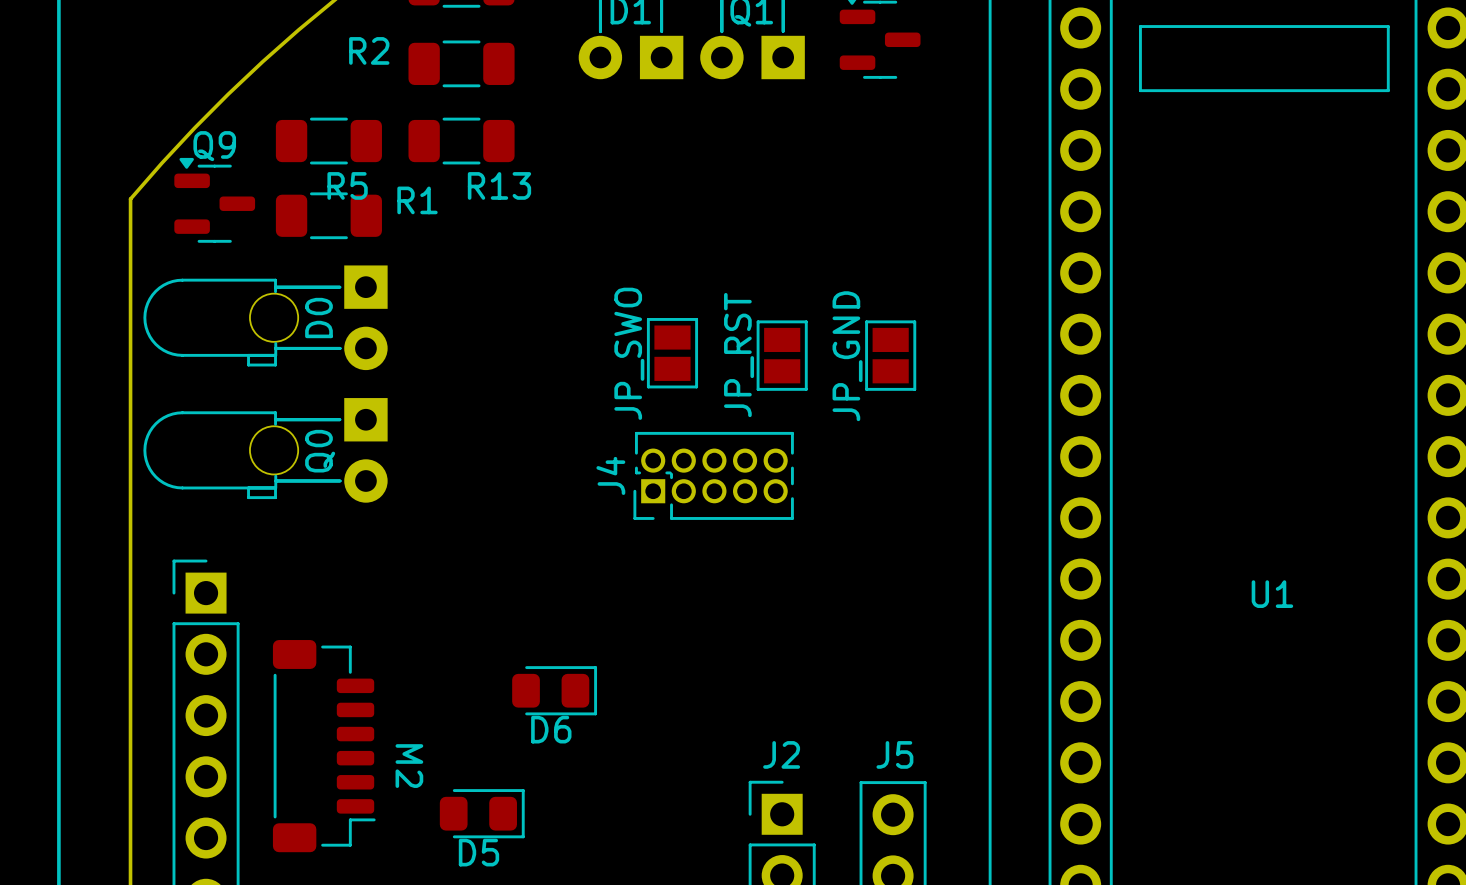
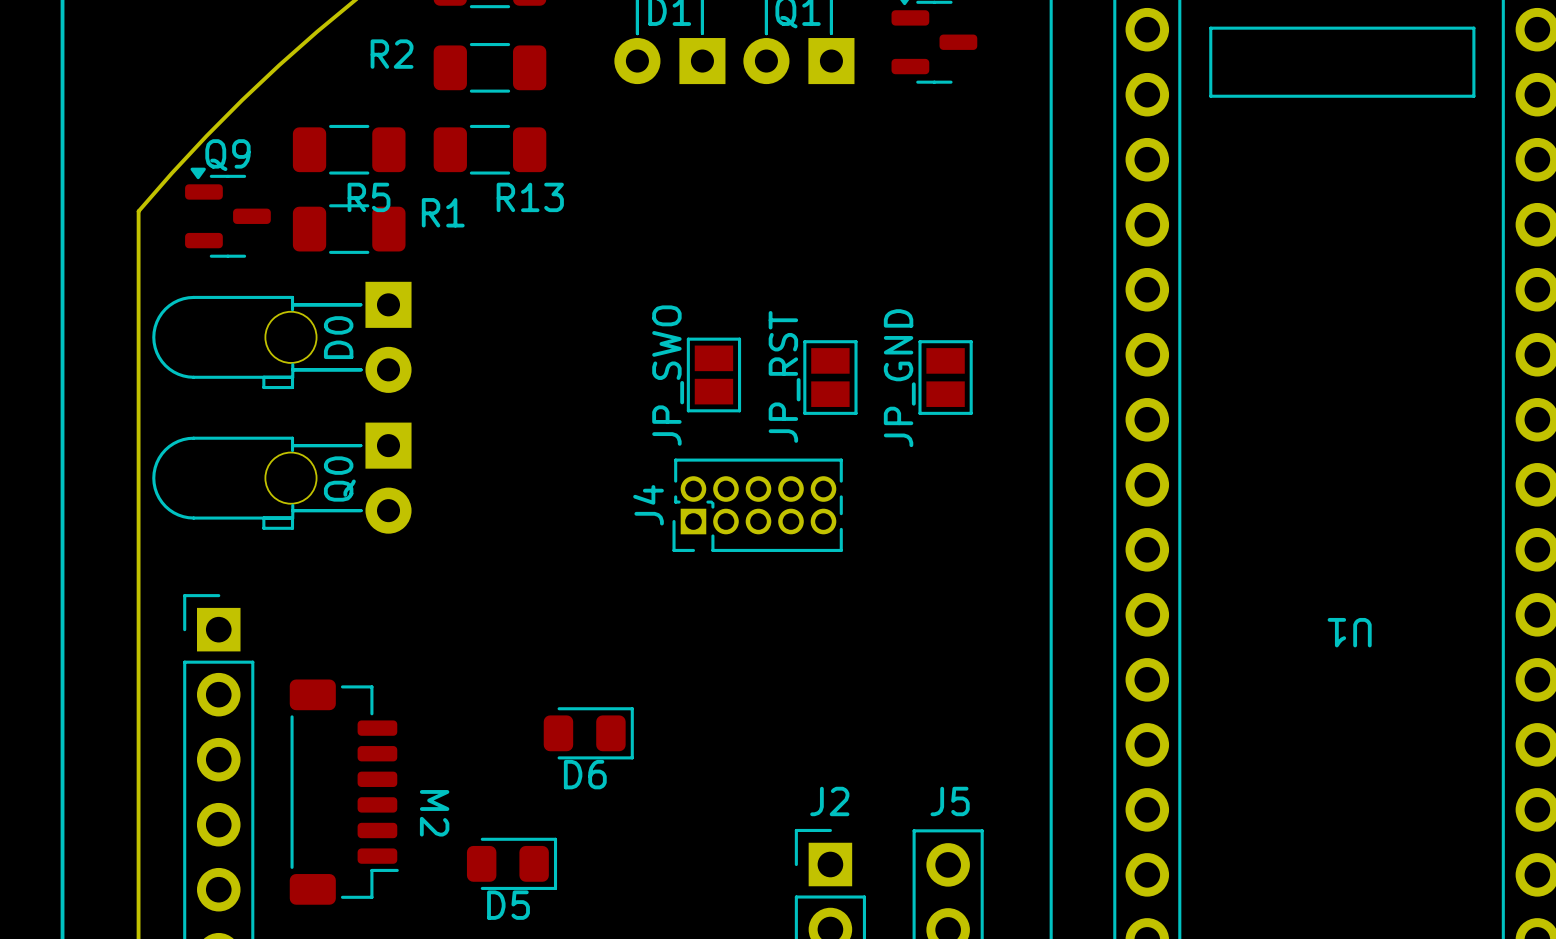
U1 name rotation: 0° (1272, 594) -> 180° (1349, 632)

